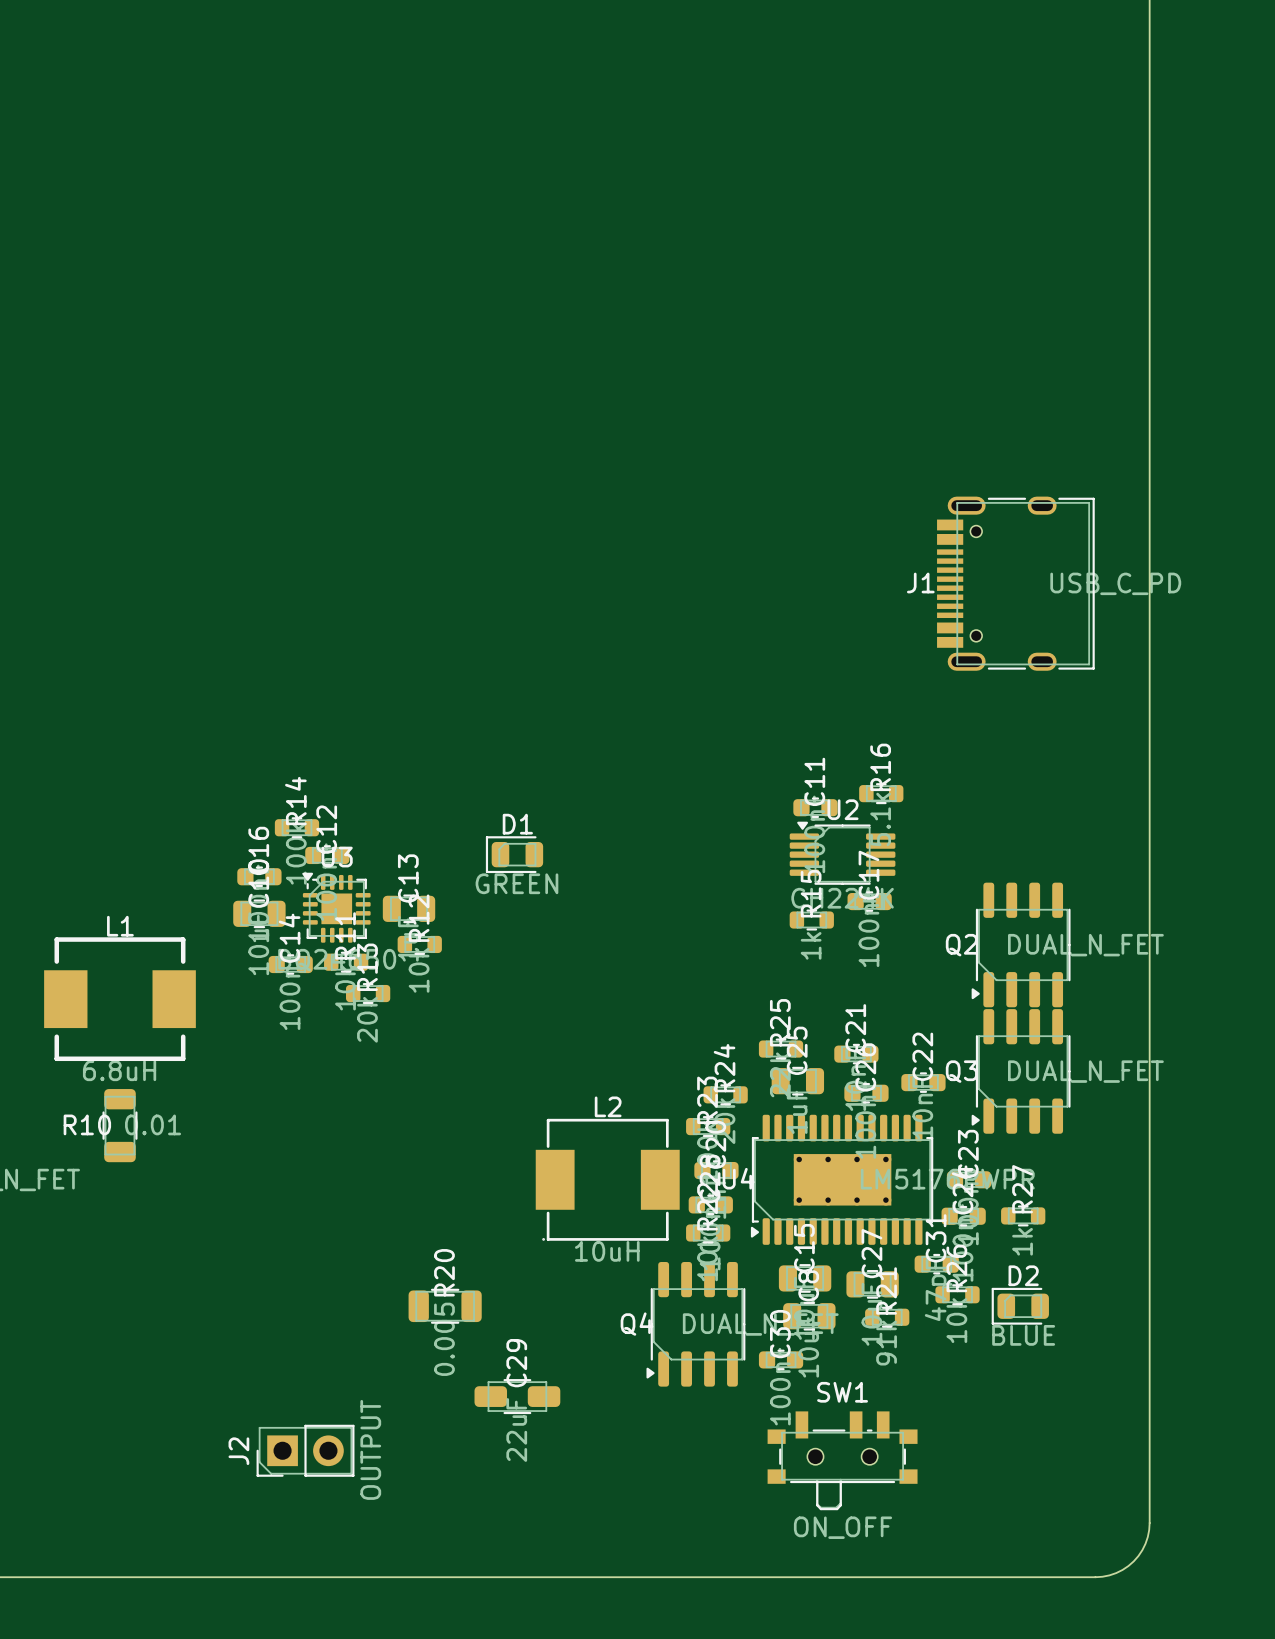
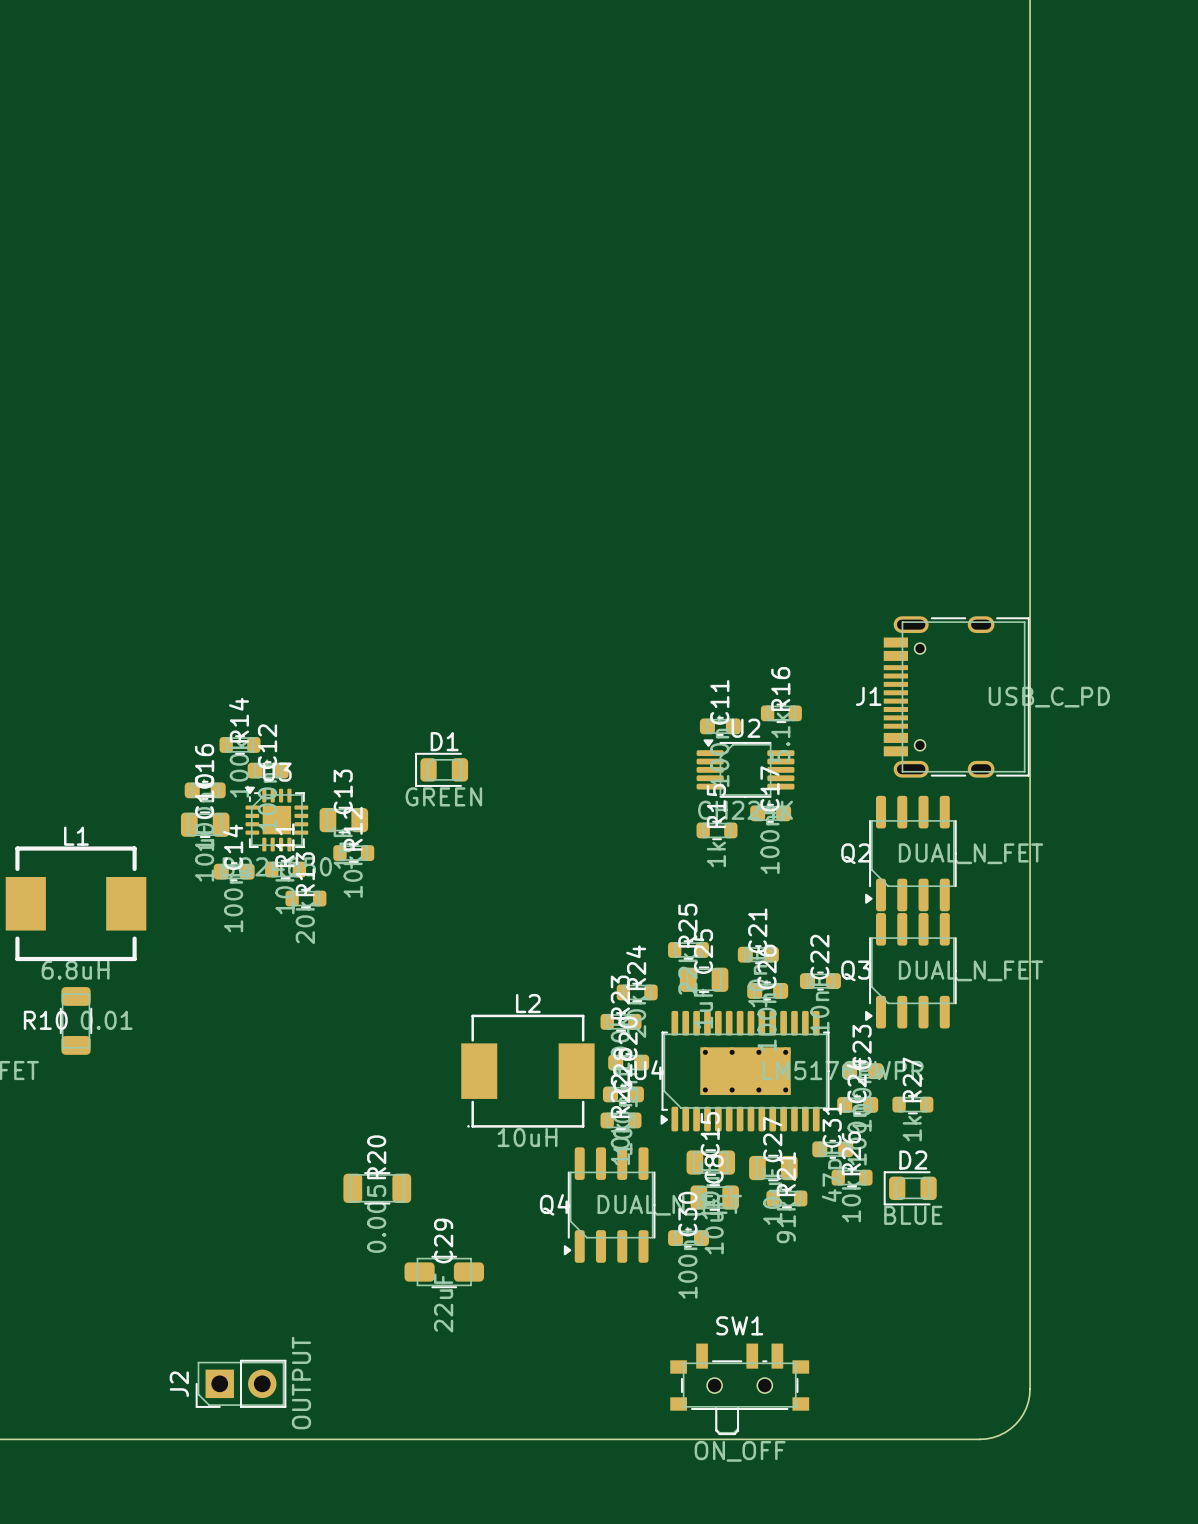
J1 position: (1015, 583) -> (956, 696)
J2 position: (305, 1450) -> (241, 1383)
SW1 position: (842, 1460) -> (739, 1389)

